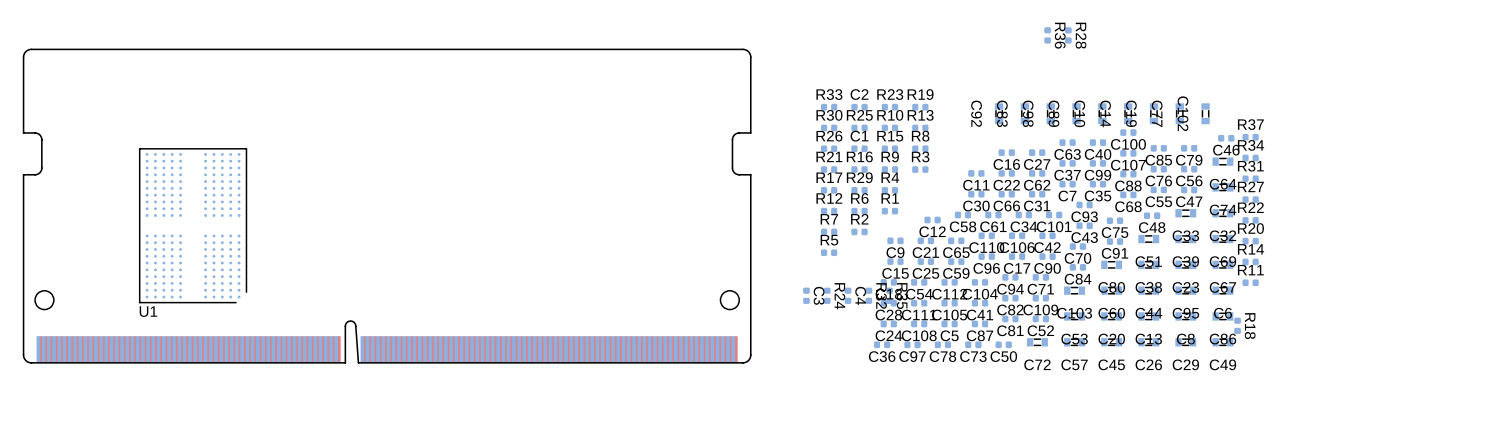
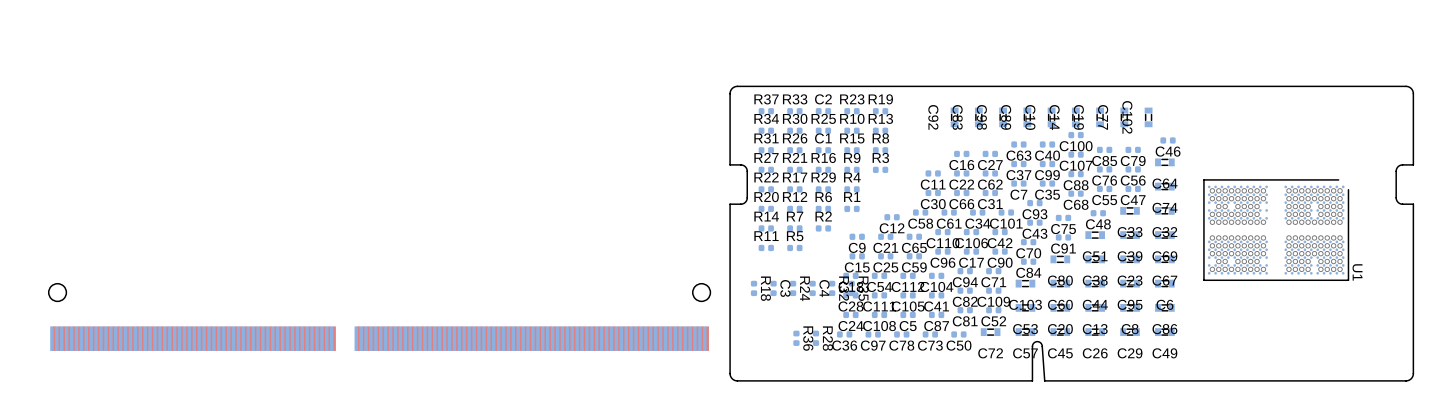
R36 position: (1047, 35) -> (796, 338)
R28 position: (1068, 35) -> (815, 338)
board edge: (742, 49) (28, 50) (23, 57) (23, 132) (35, 133) (40, 136) (41, 167) (37, 174) (23, 174) (24, 358) (31, 362) (345, 362) (345, 325) (350, 321) (355, 325) (358, 362) (745, 362) (750, 355) (750, 174) (736, 174) (732, 167) (733, 136) (738, 133) (750, 132) (750, 56) (747, 51) (742, 49) -> none
board edge: none -> (1406, 86) (734, 86) (730, 93) (730, 164) (741, 164) (746, 168) (747, 197) (743, 203) (730, 204) (730, 376) (737, 380) (1032, 380) (1032, 345) (1037, 341) (1042, 345) (1044, 380) (1408, 380) (1413, 373) (1413, 204) (1400, 203) (1396, 197) (1397, 168) (1401, 164) (1413, 164) (1413, 92) (1411, 88) (1406, 86)
R37 position: (1250, 137) -> (766, 111)
R34 position: (1250, 158) -> (766, 130)
R31 position: (1250, 178) -> (766, 150)
via: none -> (1212, 190)
via: none -> (1218, 190)
via: none -> (1225, 190)
via: none -> (1231, 190)
via: none -> (1237, 190)
via: none -> (1244, 190)
via: none -> (1250, 190)
via: none -> (1257, 190)
via: none -> (1263, 190)
via: none -> (1288, 190)
via: none -> (1295, 190)
via: none -> (1301, 190)
via: none -> (1308, 190)
via: none -> (1314, 190)
via: none -> (1320, 190)
via: none -> (1327, 190)
via: none -> (1333, 190)
via: none -> (1340, 190)
R27 position: (1250, 199) -> (766, 169)
via: none -> (1212, 198)
via: none -> (1218, 198)
via: none -> (1225, 198)
via: none -> (1231, 198)
via: none -> (1237, 198)
via: none -> (1244, 198)
via: none -> (1250, 198)
via: none -> (1257, 198)
via: none -> (1263, 198)
via: none -> (1288, 198)
via: none -> (1295, 198)
via: none -> (1301, 198)
via: none -> (1308, 198)
via: none -> (1314, 198)
via: none -> (1320, 198)
via: none -> (1327, 198)
via: none -> (1333, 198)
via: none -> (1340, 198)
via: none -> (1218, 206)
via: none -> (1225, 206)
via: none -> (1237, 206)
via: none -> (1244, 206)
via: none -> (1250, 206)
via: none -> (1257, 206)
via: none -> (1288, 206)
via: none -> (1295, 206)
via: none -> (1301, 206)
via: none -> (1308, 206)
via: none -> (1320, 206)
via: none -> (1327, 206)
via: none -> (1333, 206)
via: none -> (1340, 206)
via: none -> (1212, 214)
via: none -> (1218, 214)
via: none -> (1225, 214)
via: none -> (1231, 214)
via: none -> (1237, 214)
via: none -> (1244, 214)
via: none -> (1250, 214)
via: none -> (1257, 214)
via: none -> (1288, 214)
via: none -> (1295, 214)
via: none -> (1301, 214)
via: none -> (1308, 214)
via: none -> (1320, 214)
via: none -> (1327, 214)
via: none -> (1333, 214)
via: none -> (1340, 214)
R22 position: (1250, 220) -> (766, 189)
U1 rotation: 0° (193, 225) -> 90° counterclockwise (1276, 230)
U1 position: (193, 225) -> (1276, 230)
via: none -> (1212, 222)
via: none -> (1218, 222)
via: none -> (1225, 222)
via: none -> (1231, 222)
via: none -> (1237, 222)
via: none -> (1244, 222)
via: none -> (1250, 222)
via: none -> (1257, 222)
via: none -> (1263, 222)
via: none -> (1288, 222)
via: none -> (1295, 222)
via: none -> (1301, 222)
via: none -> (1308, 222)
via: none -> (1314, 222)
via: none -> (1320, 222)
via: none -> (1327, 222)
via: none -> (1333, 222)
via: none -> (1340, 222)
R20 position: (1250, 241) -> (766, 208)
via: none -> (1212, 237)
via: none -> (1218, 237)
via: none -> (1225, 237)
via: none -> (1231, 237)
via: none -> (1237, 237)
via: none -> (1244, 237)
via: none -> (1250, 237)
via: none -> (1257, 237)
via: none -> (1263, 237)
via: none -> (1288, 237)
via: none -> (1295, 237)
via: none -> (1301, 237)
via: none -> (1308, 237)
via: none -> (1314, 237)
via: none -> (1320, 237)
via: none -> (1327, 237)
via: none -> (1333, 237)
via: none -> (1340, 237)
via: none -> (1212, 245)
via: none -> (1218, 245)
via: none -> (1225, 245)
via: none -> (1231, 245)
via: none -> (1237, 245)
via: none -> (1244, 245)
via: none -> (1250, 245)
via: none -> (1257, 245)
via: none -> (1263, 245)
via: none -> (1288, 245)
via: none -> (1295, 245)
via: none -> (1301, 245)
via: none -> (1308, 245)
via: none -> (1314, 245)
via: none -> (1320, 245)
via: none -> (1327, 245)
via: none -> (1333, 245)
via: none -> (1340, 245)
via: none -> (1212, 253)
via: none -> (1218, 253)
via: none -> (1225, 253)
via: none -> (1231, 253)
via: none -> (1237, 253)
via: none -> (1244, 253)
via: none -> (1250, 253)
via: none -> (1257, 253)
via: none -> (1263, 253)
via: none -> (1288, 253)
via: none -> (1295, 253)
via: none -> (1301, 253)
via: none -> (1308, 253)
via: none -> (1314, 253)
via: none -> (1320, 253)
via: none -> (1327, 253)
via: none -> (1333, 253)
via: none -> (1340, 253)
R14 position: (1250, 261) -> (766, 228)
via: none -> (1218, 261)
via: none -> (1225, 261)
via: none -> (1237, 261)
via: none -> (1244, 261)
via: none -> (1250, 261)
via: none -> (1257, 261)
via: none -> (1288, 261)
via: none -> (1295, 261)
via: none -> (1301, 261)
via: none -> (1308, 261)
via: none -> (1320, 261)
via: none -> (1327, 261)
via: none -> (1333, 261)
via: none -> (1340, 261)
via: none -> (1212, 269)
via: none -> (1218, 269)
via: none -> (1225, 269)
via: none -> (1231, 269)
via: none -> (1237, 269)
via: none -> (1244, 269)
via: none -> (1250, 269)
via: none -> (1257, 269)
via: none -> (1263, 269)
via: none -> (1288, 269)
via: none -> (1295, 269)
via: none -> (1301, 269)
via: none -> (1308, 269)
via: none -> (1320, 269)
via: none -> (1327, 269)
via: none -> (1333, 269)
via: none -> (1340, 269)
R11 position: (1250, 282) -> (766, 247)
R18 position: (1237, 325) -> (754, 288)

